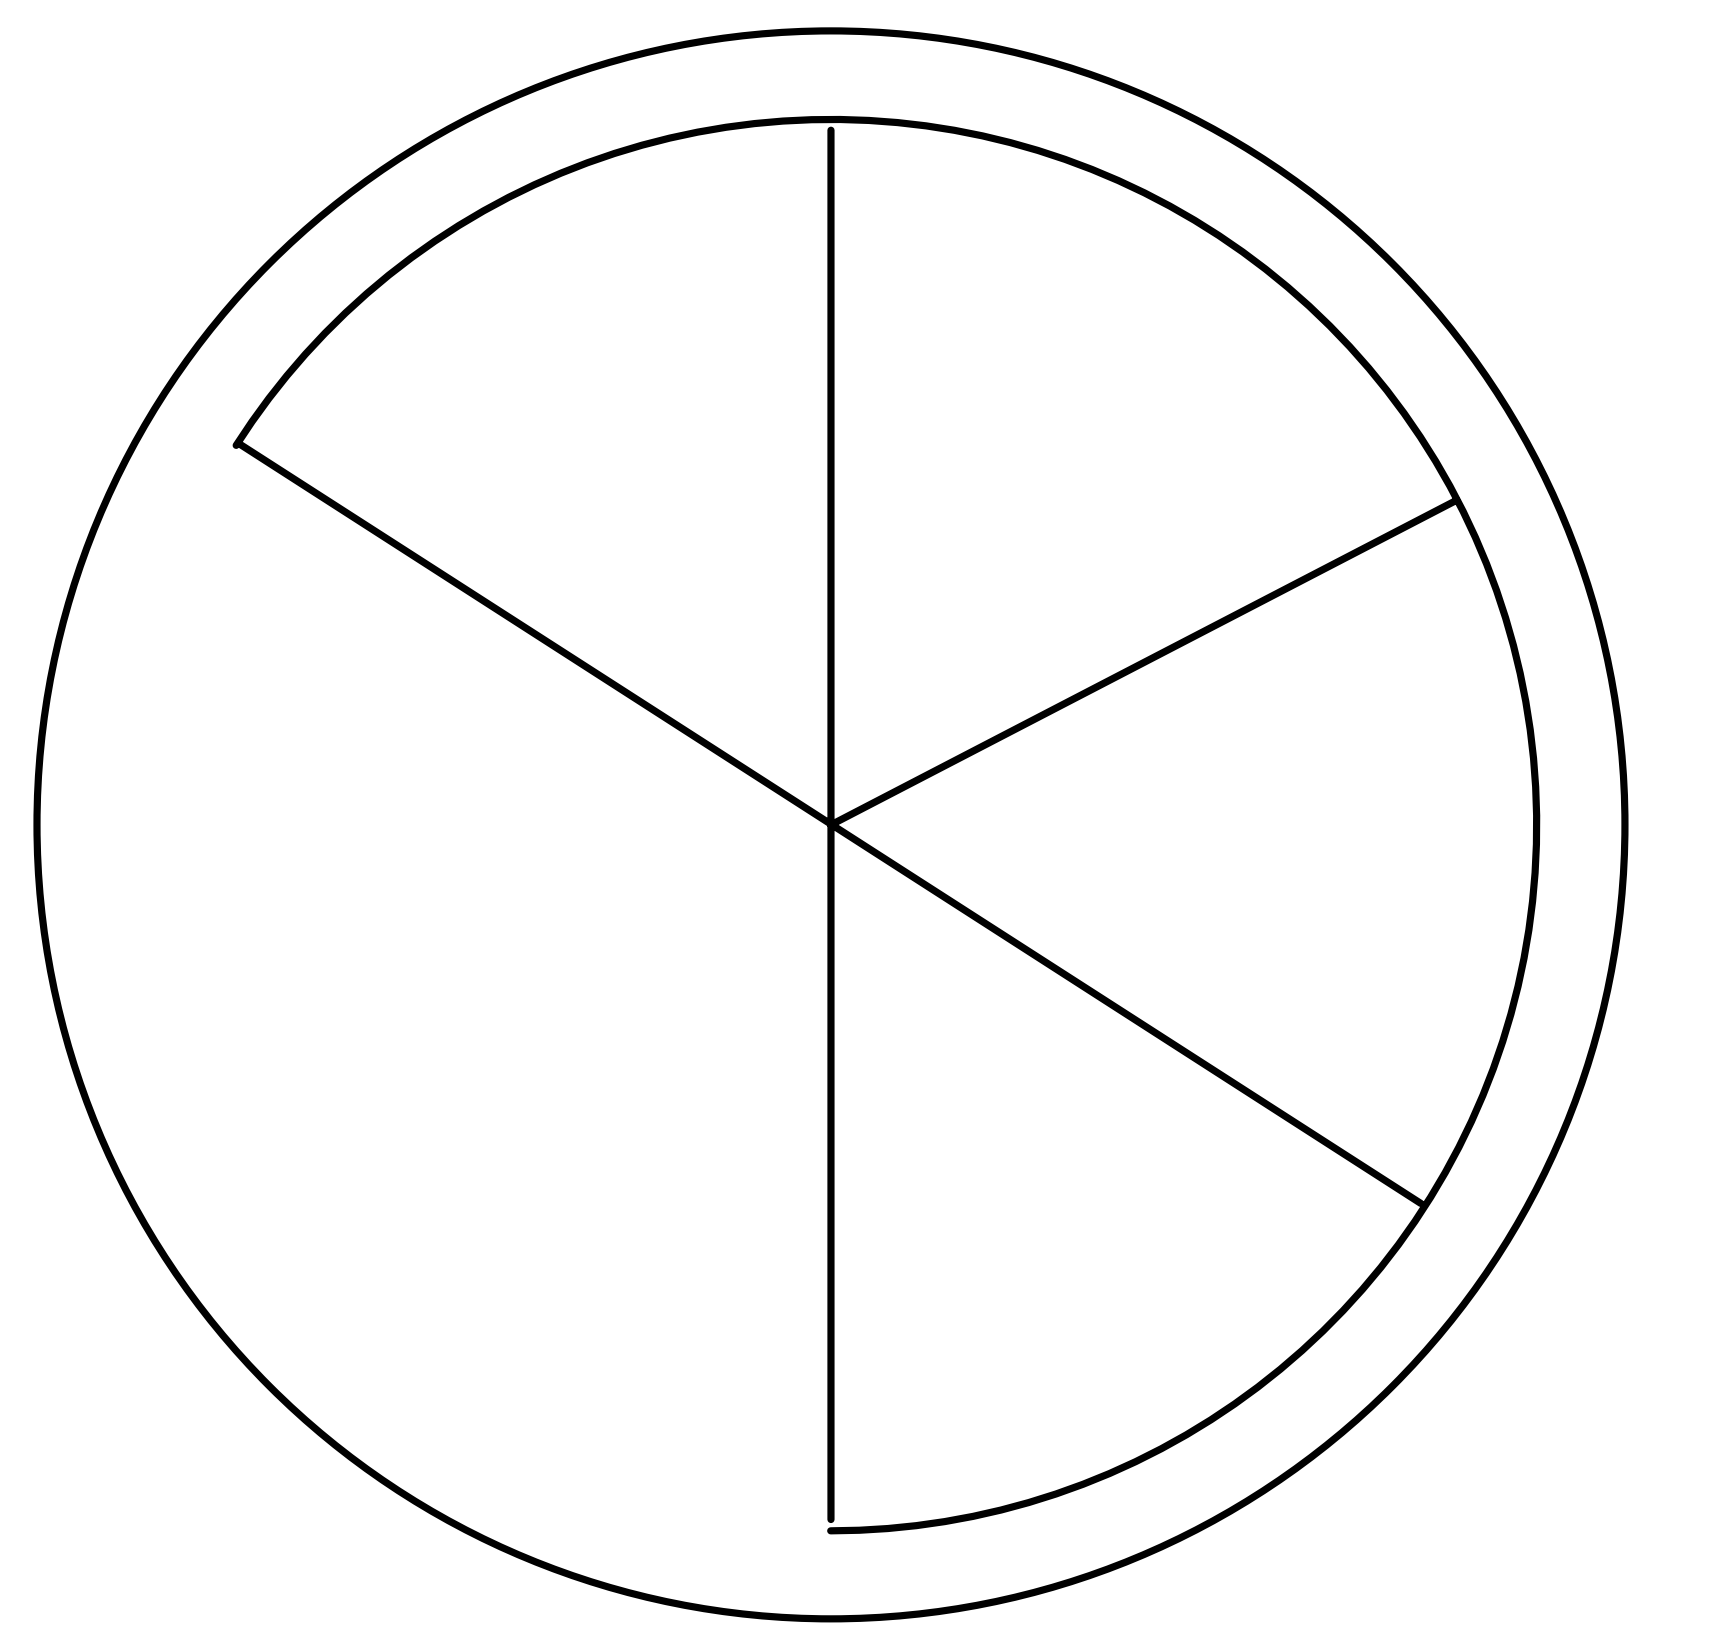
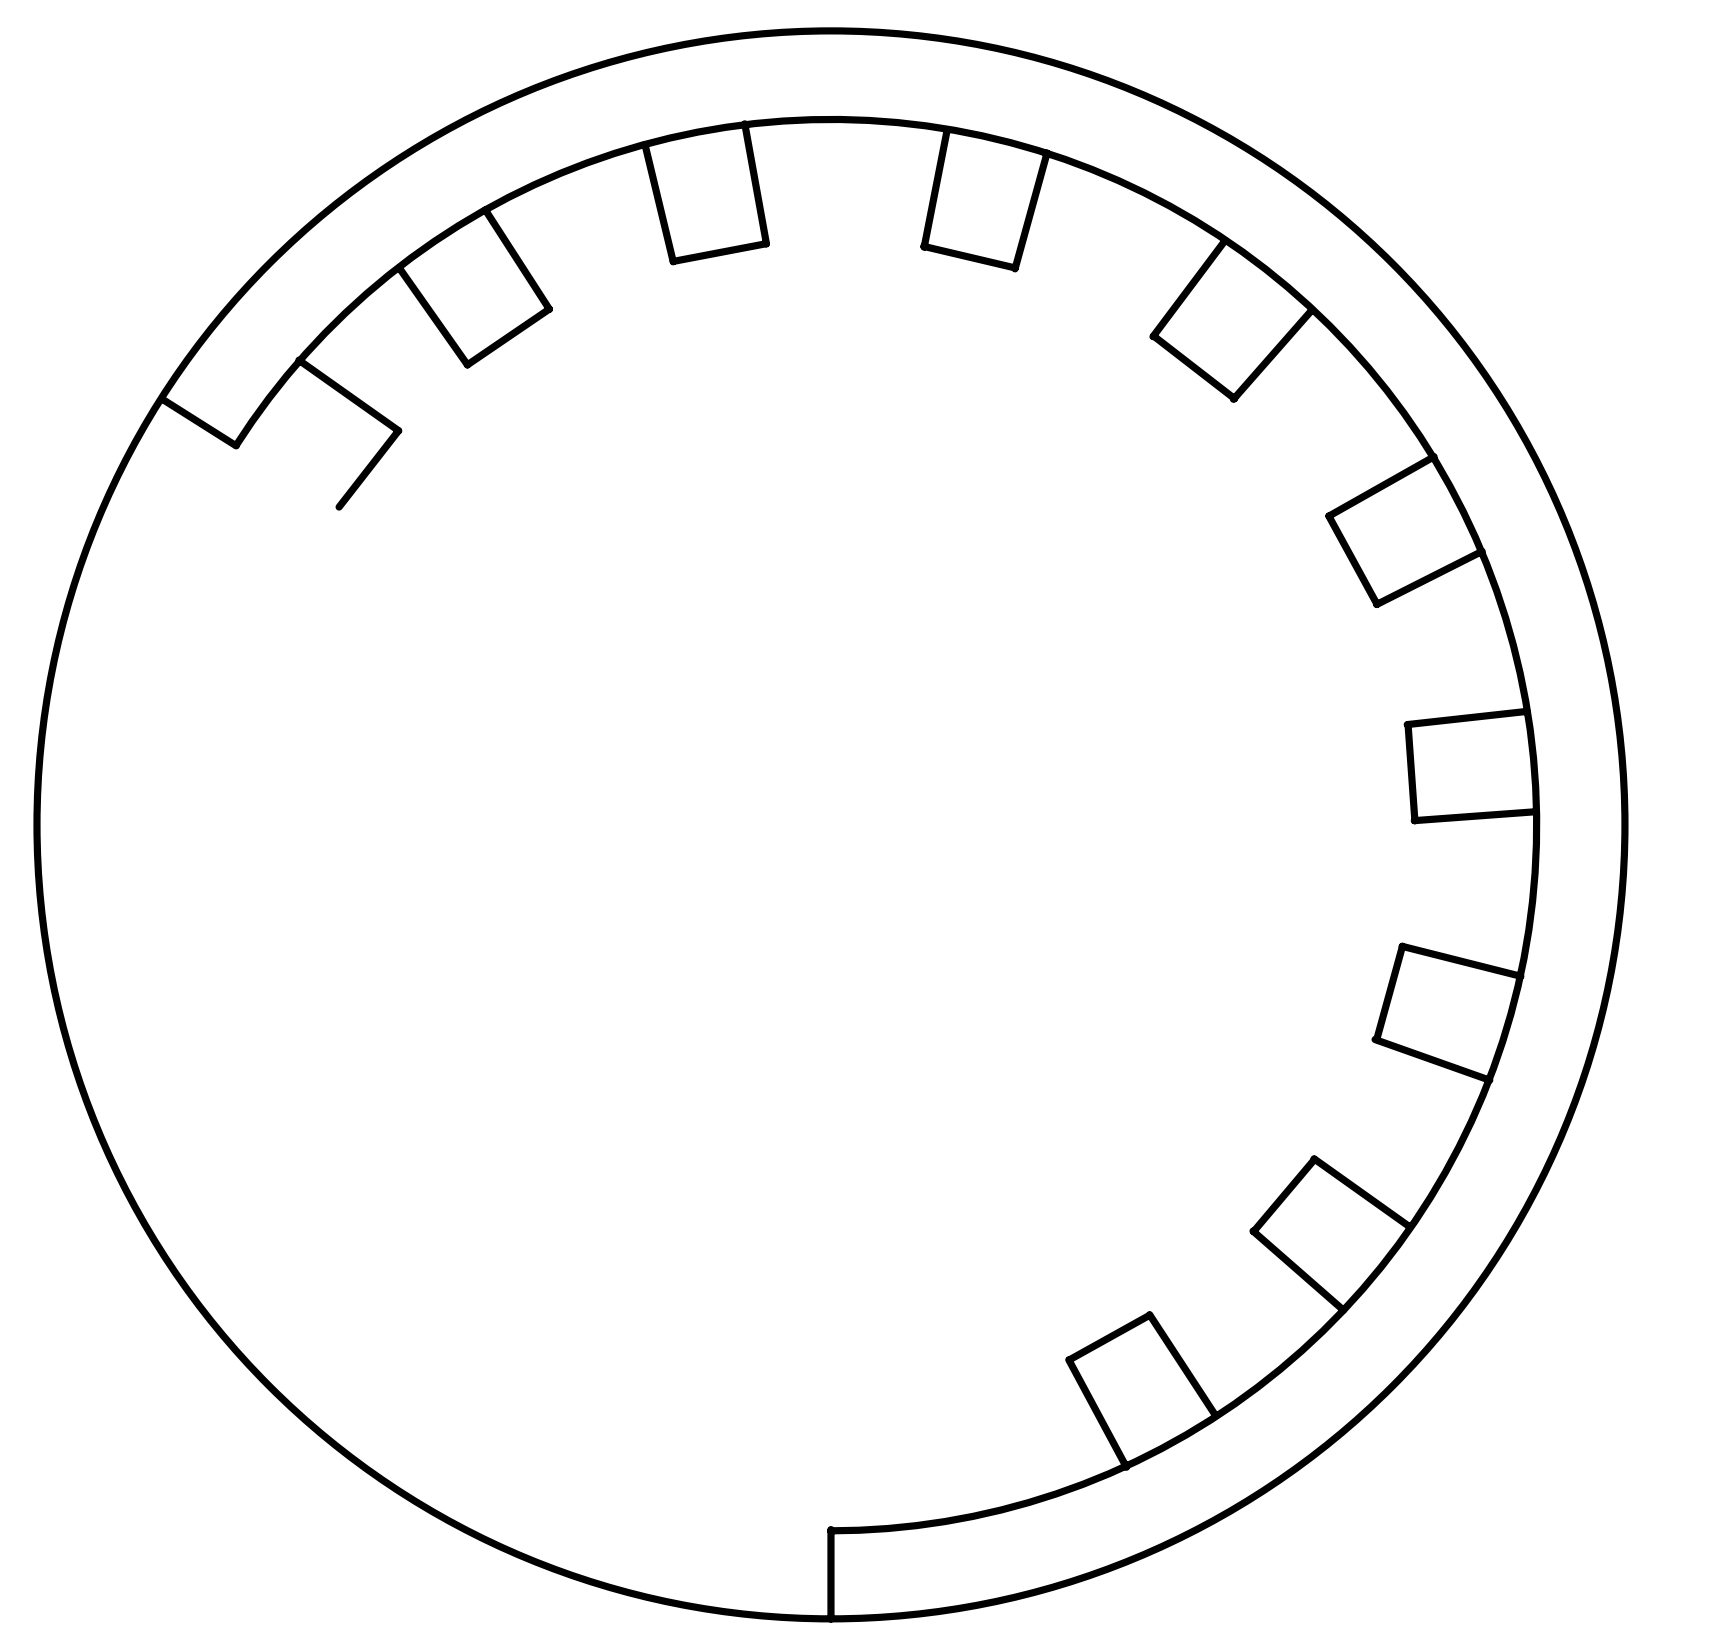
board edge: none -> (744, 123) (766, 243)
board edge: none -> (947, 129) (924, 247)
board edge: (830, 130) (830, 1519) -> none
board edge: none -> (645, 144) (673, 261)
board edge: none -> (1047, 153) (1015, 268)
board edge: none -> (485, 210) (549, 309)
board edge: none -> (1225, 240) (1153, 336)
board edge: none -> (766, 243) (673, 261)
board edge: none -> (923, 246) (1015, 267)
board edge: none -> (399, 267) (467, 364)
board edge: none -> (549, 309) (467, 364)
board edge: none -> (1312, 309) (1233, 399)
board edge: none -> (1153, 335) (1234, 398)
board edge: none -> (298, 360) (398, 430)
board edge: none -> (161, 398) (236, 445)
board edge: none -> (398, 430) (339, 507)
board edge: (239, 443) (1420, 1203) -> none
board edge: none -> (1434, 456) (1329, 516)
board edge: (1456, 500) (830, 824) -> none
board edge: none -> (1328, 516) (1377, 604)
board edge: none -> (1482, 551) (1376, 604)
board edge: none -> (1526, 711) (1407, 724)
board edge: none -> (1408, 724) (1414, 820)
board edge: none -> (1536, 811) (1414, 820)
board edge: none -> (1402, 946) (1376, 1039)
board edge: none -> (1402, 946) (1520, 976)
board edge: none -> (1375, 1039) (1489, 1080)
board edge: none -> (1314, 1158) (1410, 1227)
board edge: none -> (1314, 1159) (1253, 1231)
board edge: none -> (1253, 1231) (1343, 1310)
board edge: none -> (1149, 1314) (1215, 1415)
board edge: none -> (1149, 1315) (1069, 1359)
board edge: none -> (1068, 1359) (1126, 1467)
board edge: none -> (830, 1529) (830, 1619)

